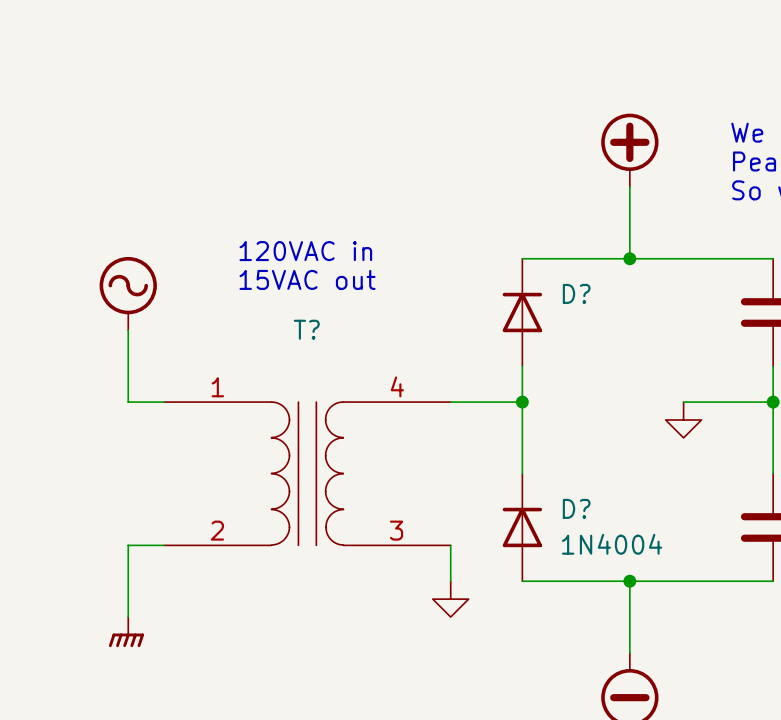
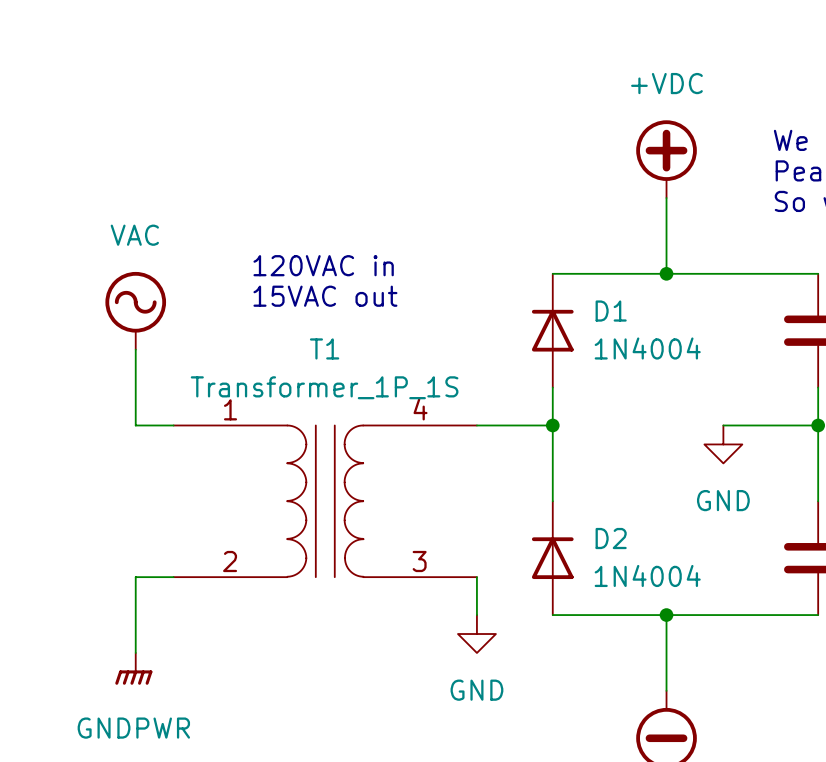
power symbol text: none -> +VDC (666, 83)
power symbol text: none -> VAC (134, 235)
D? name: D? (576, 293) -> D1 (611, 311)
T? name: T? (306, 329) -> T1 (324, 348)
D? value: none -> 1N4004 (647, 348)
T? value: none -> Transformer_1P_1S (324, 387)
power symbol text: none -> GND (723, 500)
D? name: D? (576, 508) -> D2 (611, 538)
power symbol text: none -> GND (476, 690)
power symbol text: none -> GNDPWR (133, 728)

